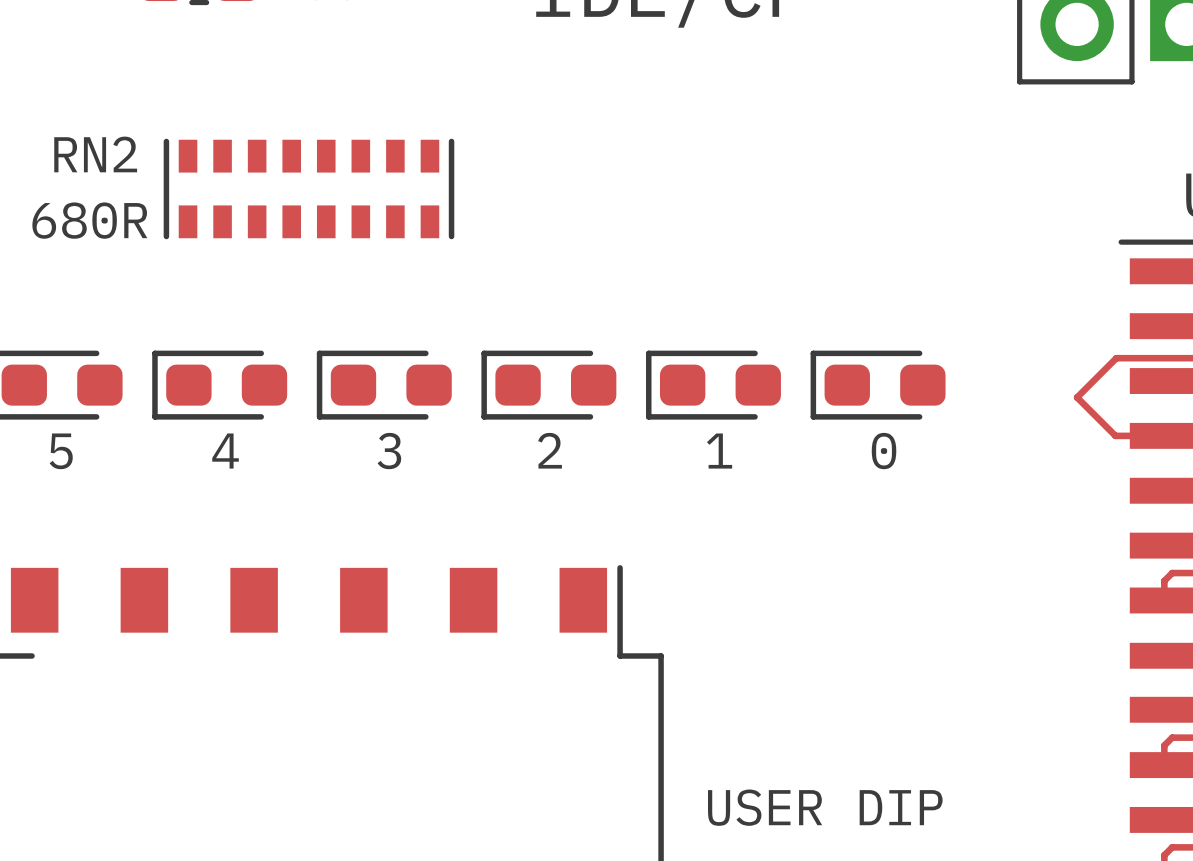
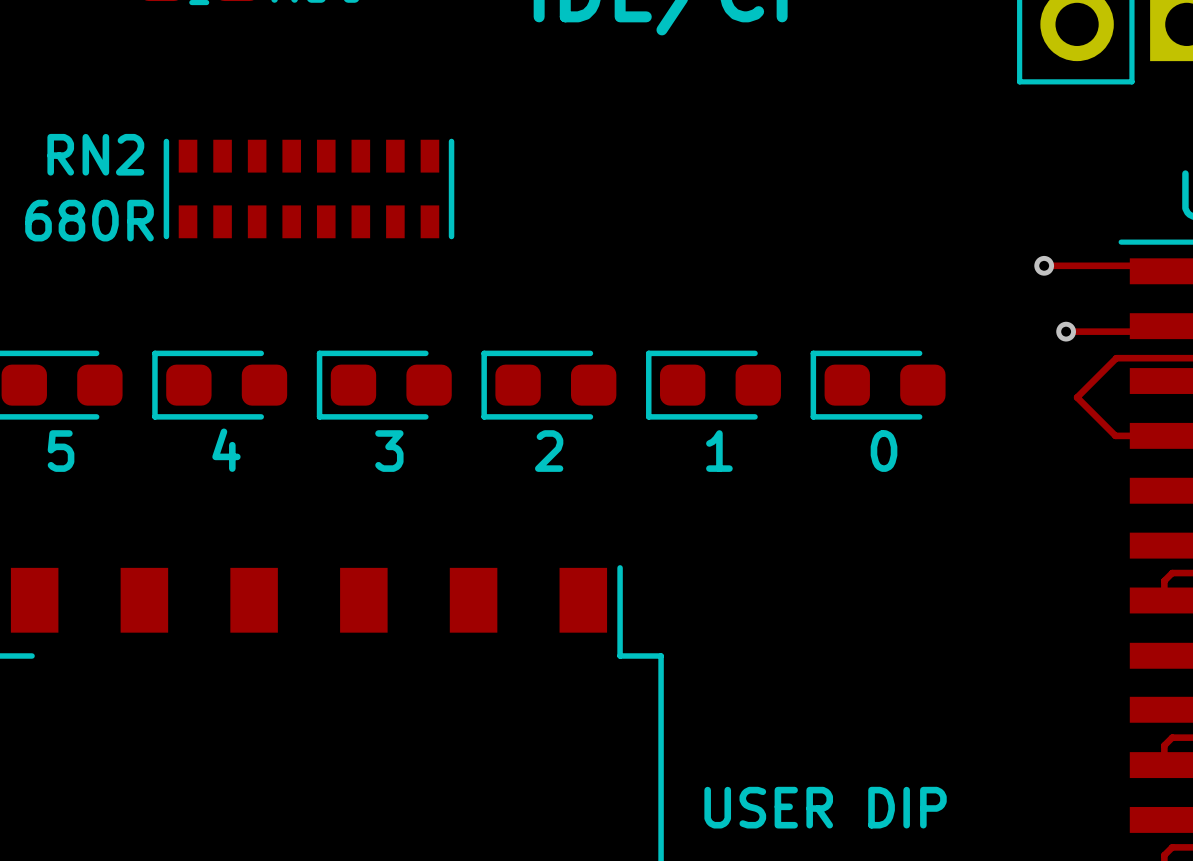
track: none -> (1044, 265) (1158, 265) (1164, 271)
via: none -> (1044, 265)
track: none -> (1164, 326) (1158, 331) (1066, 331)
via: none -> (1066, 331)

